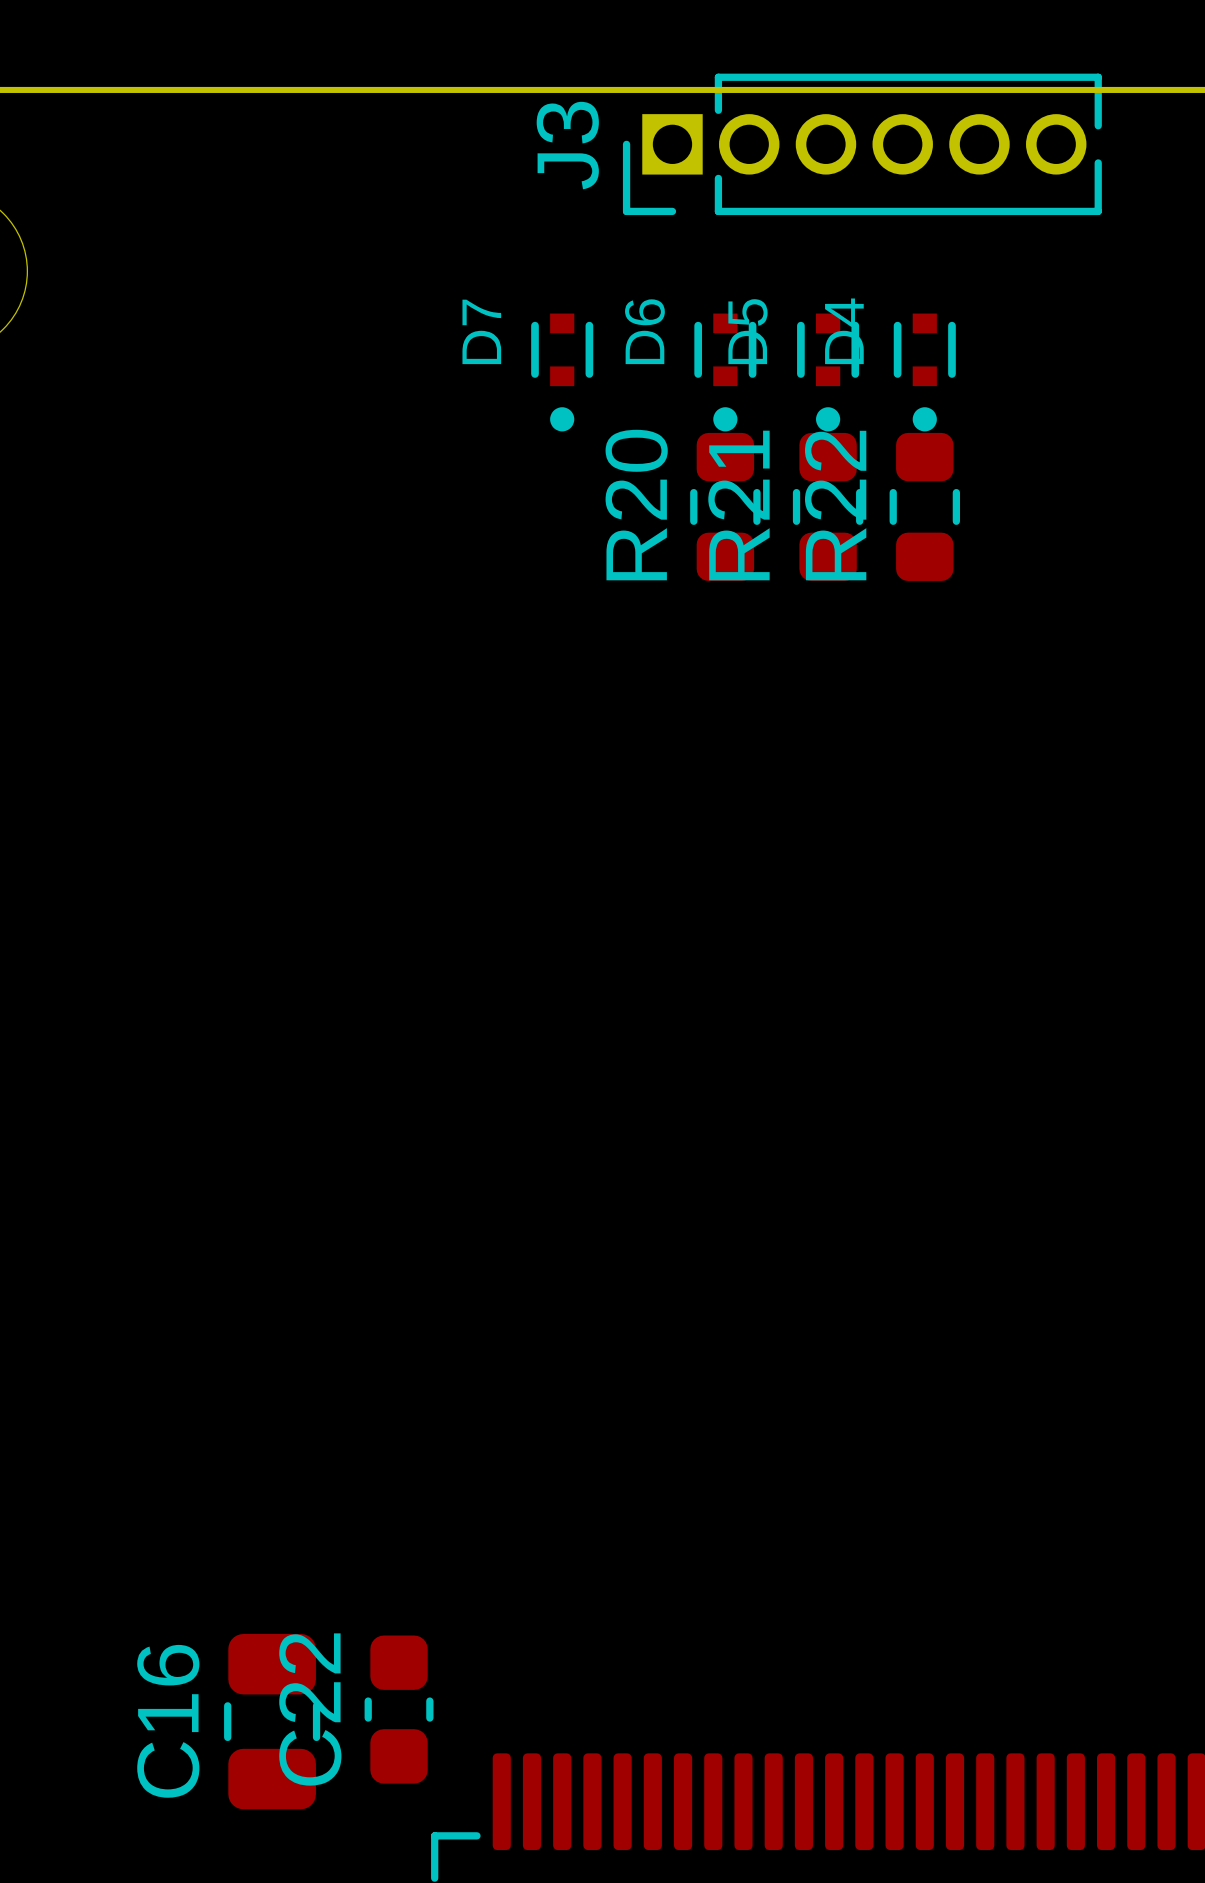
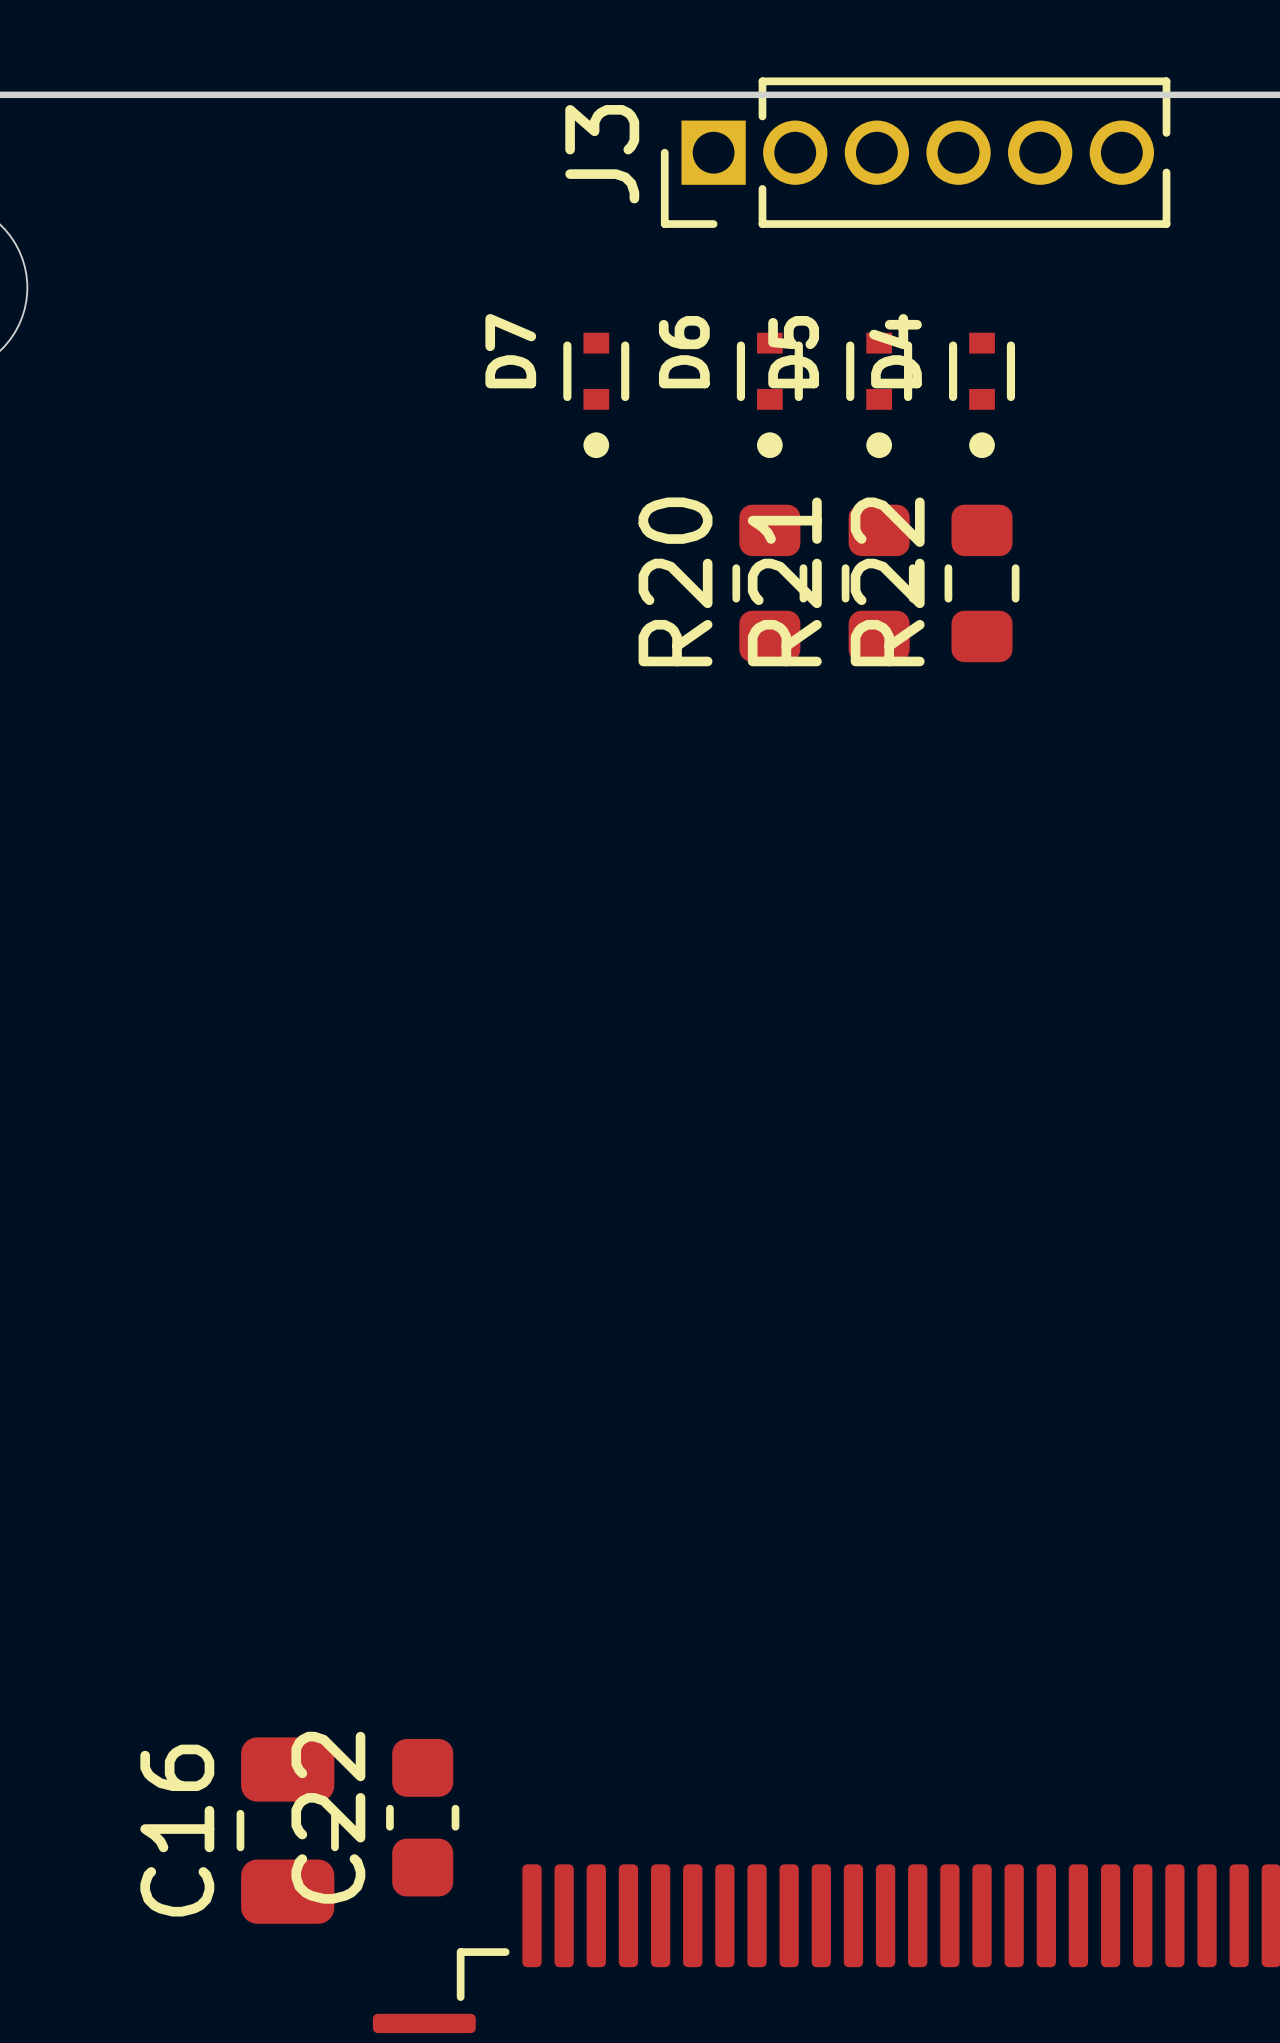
R20 position: (725, 506) -> (769, 583)
R21 position: (828, 506) -> (879, 583)
R22 position: (924, 506) -> (982, 583)

